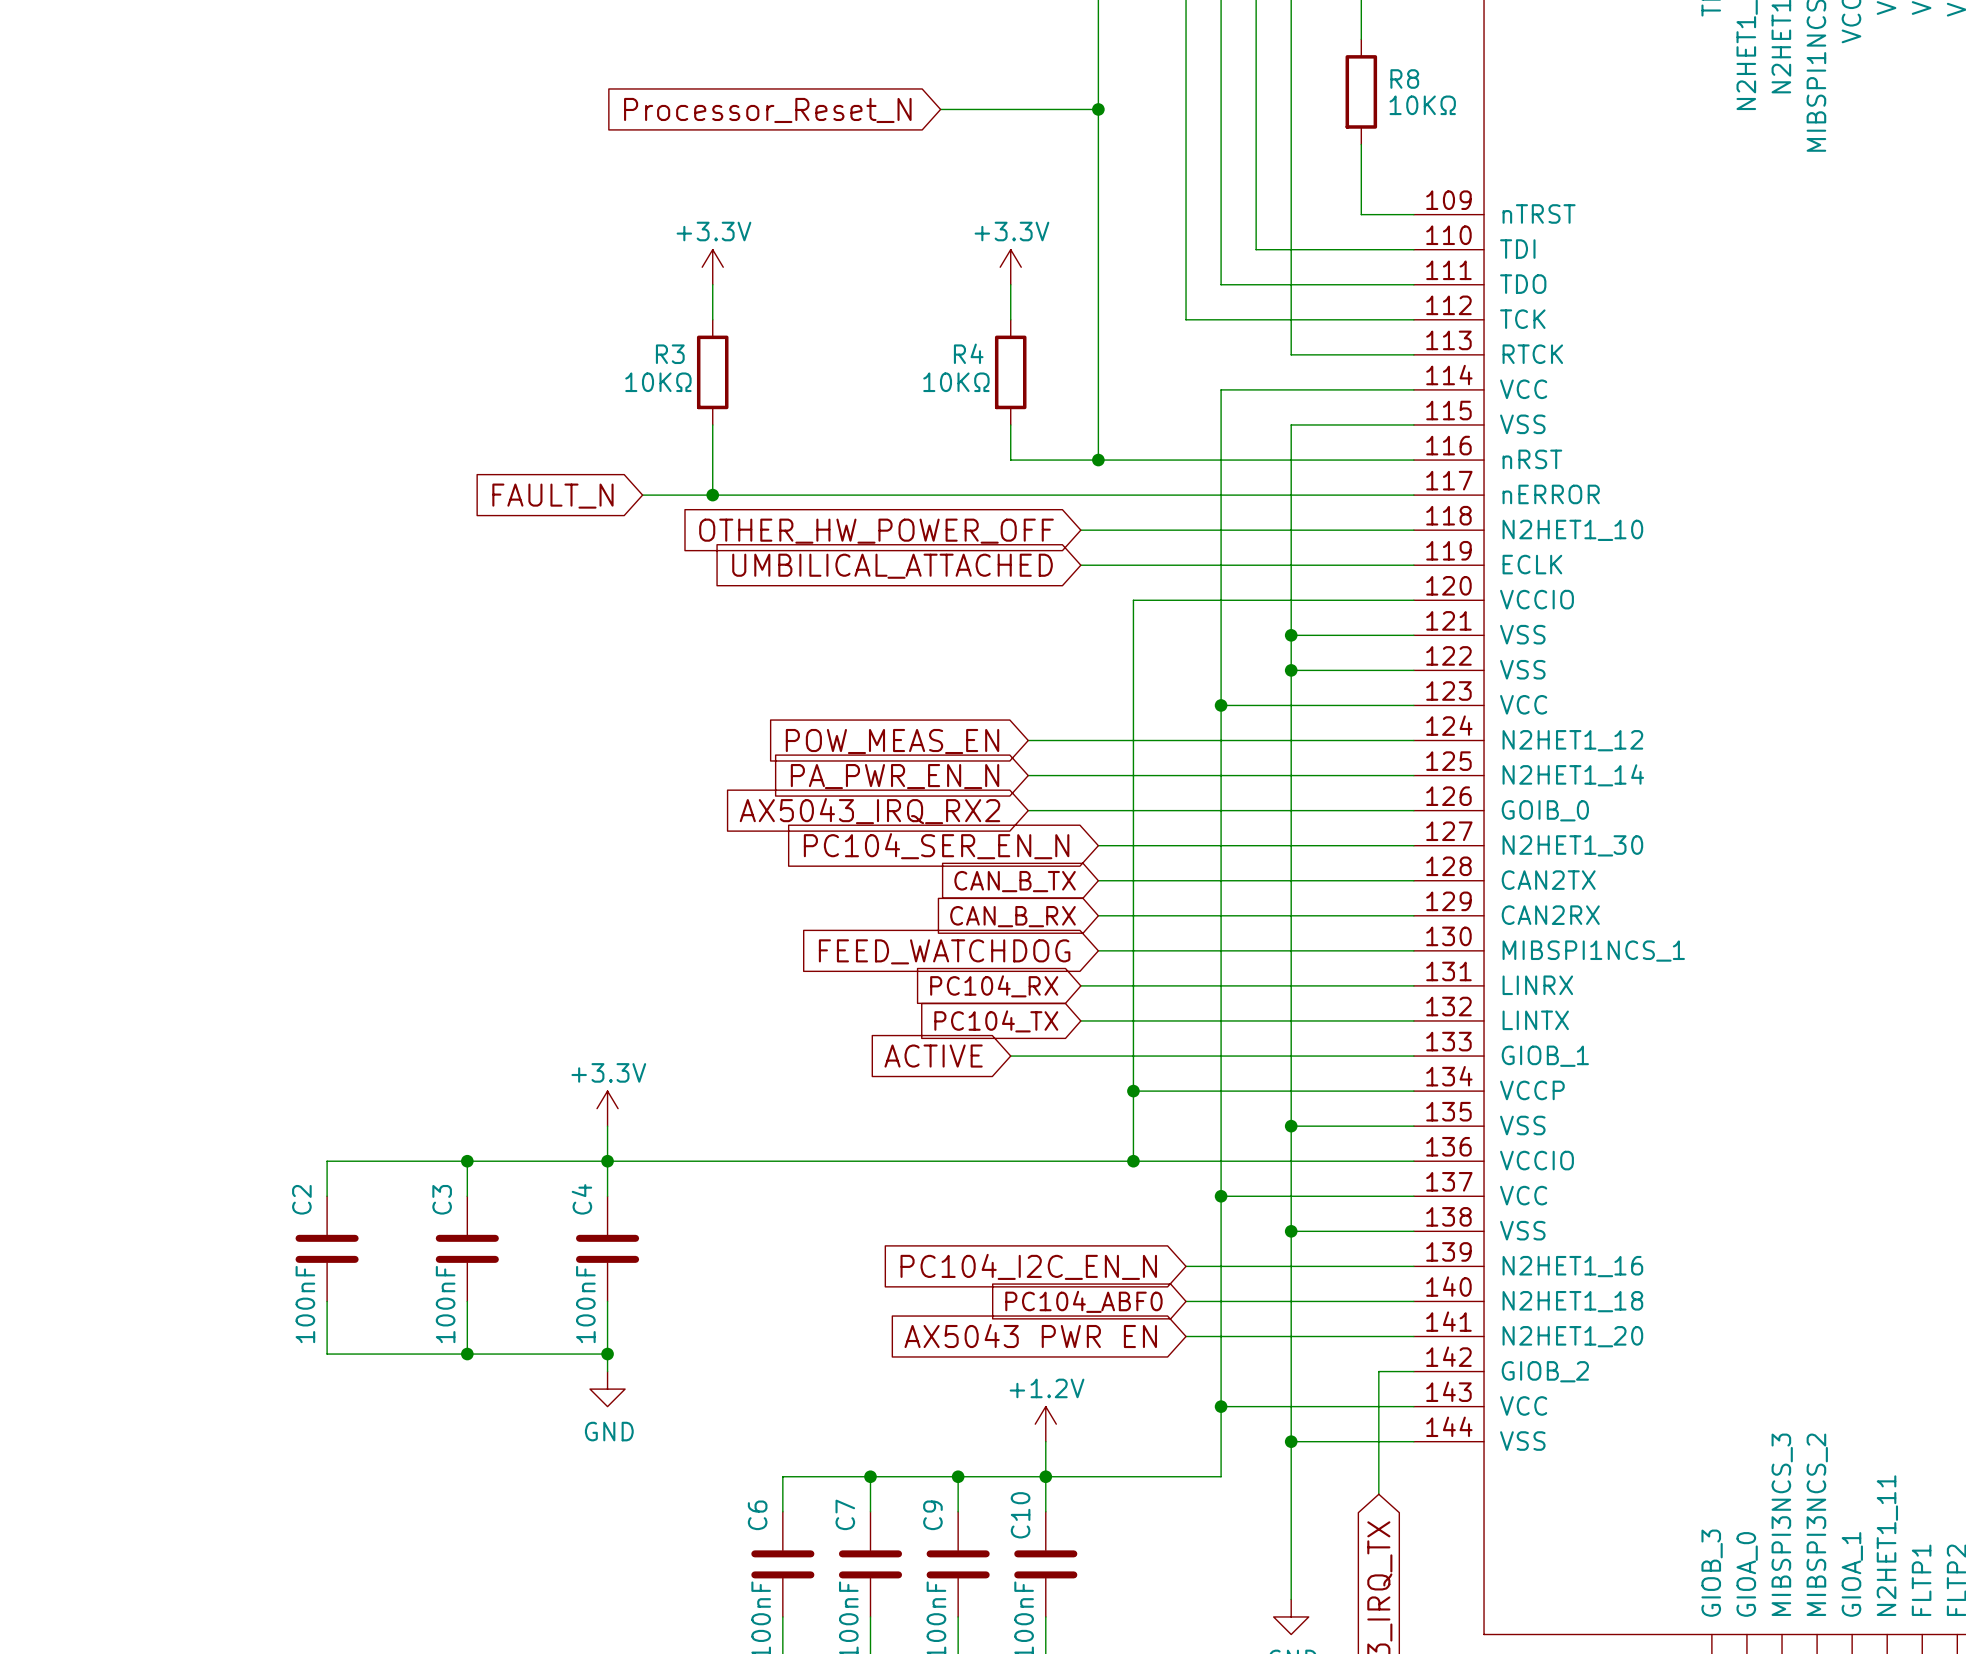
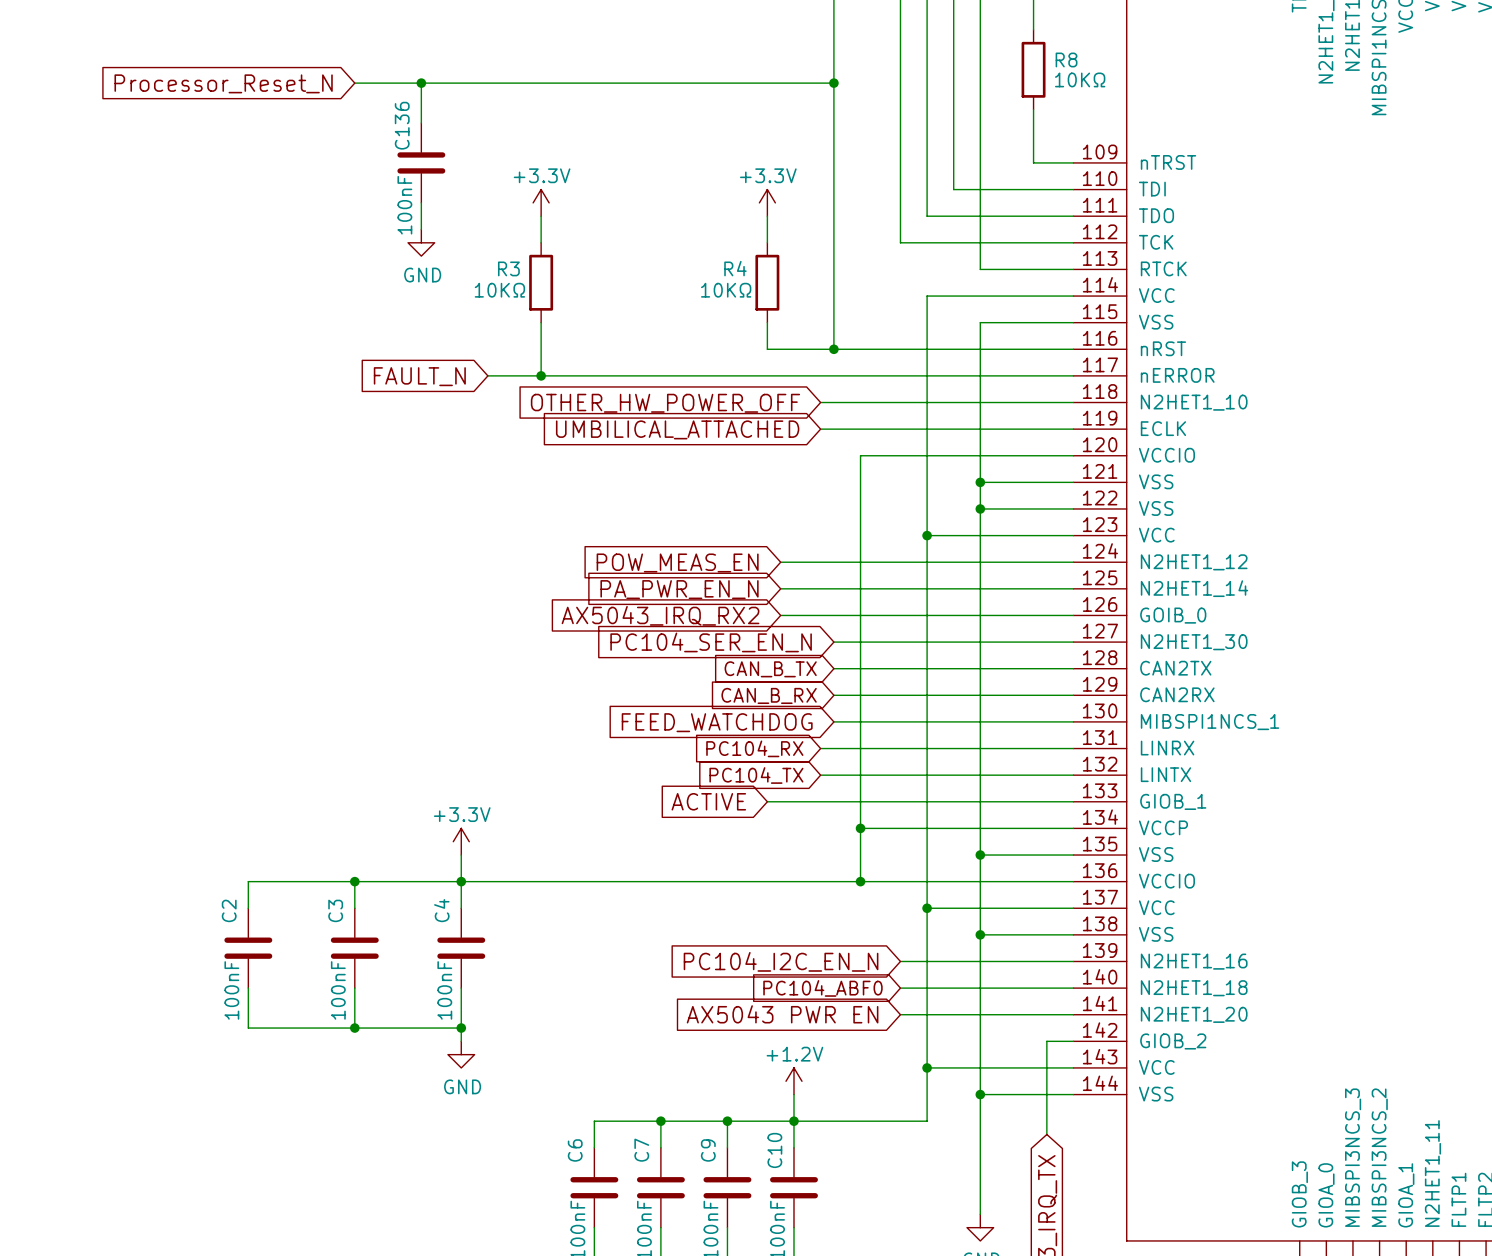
wire: none -> (354, 83) (714, 83)
wire: none -> (421, 83) (421, 123)
junction: none -> (421, 83)
global label: none -> Processor_Reset_N (223, 83)
global label: Processor_Reset_N (767, 110) -> none
C136: none -> 100nF (421, 162)
wire: none -> (421, 202) (421, 229)
power symbol: none -> GND (421, 242)

